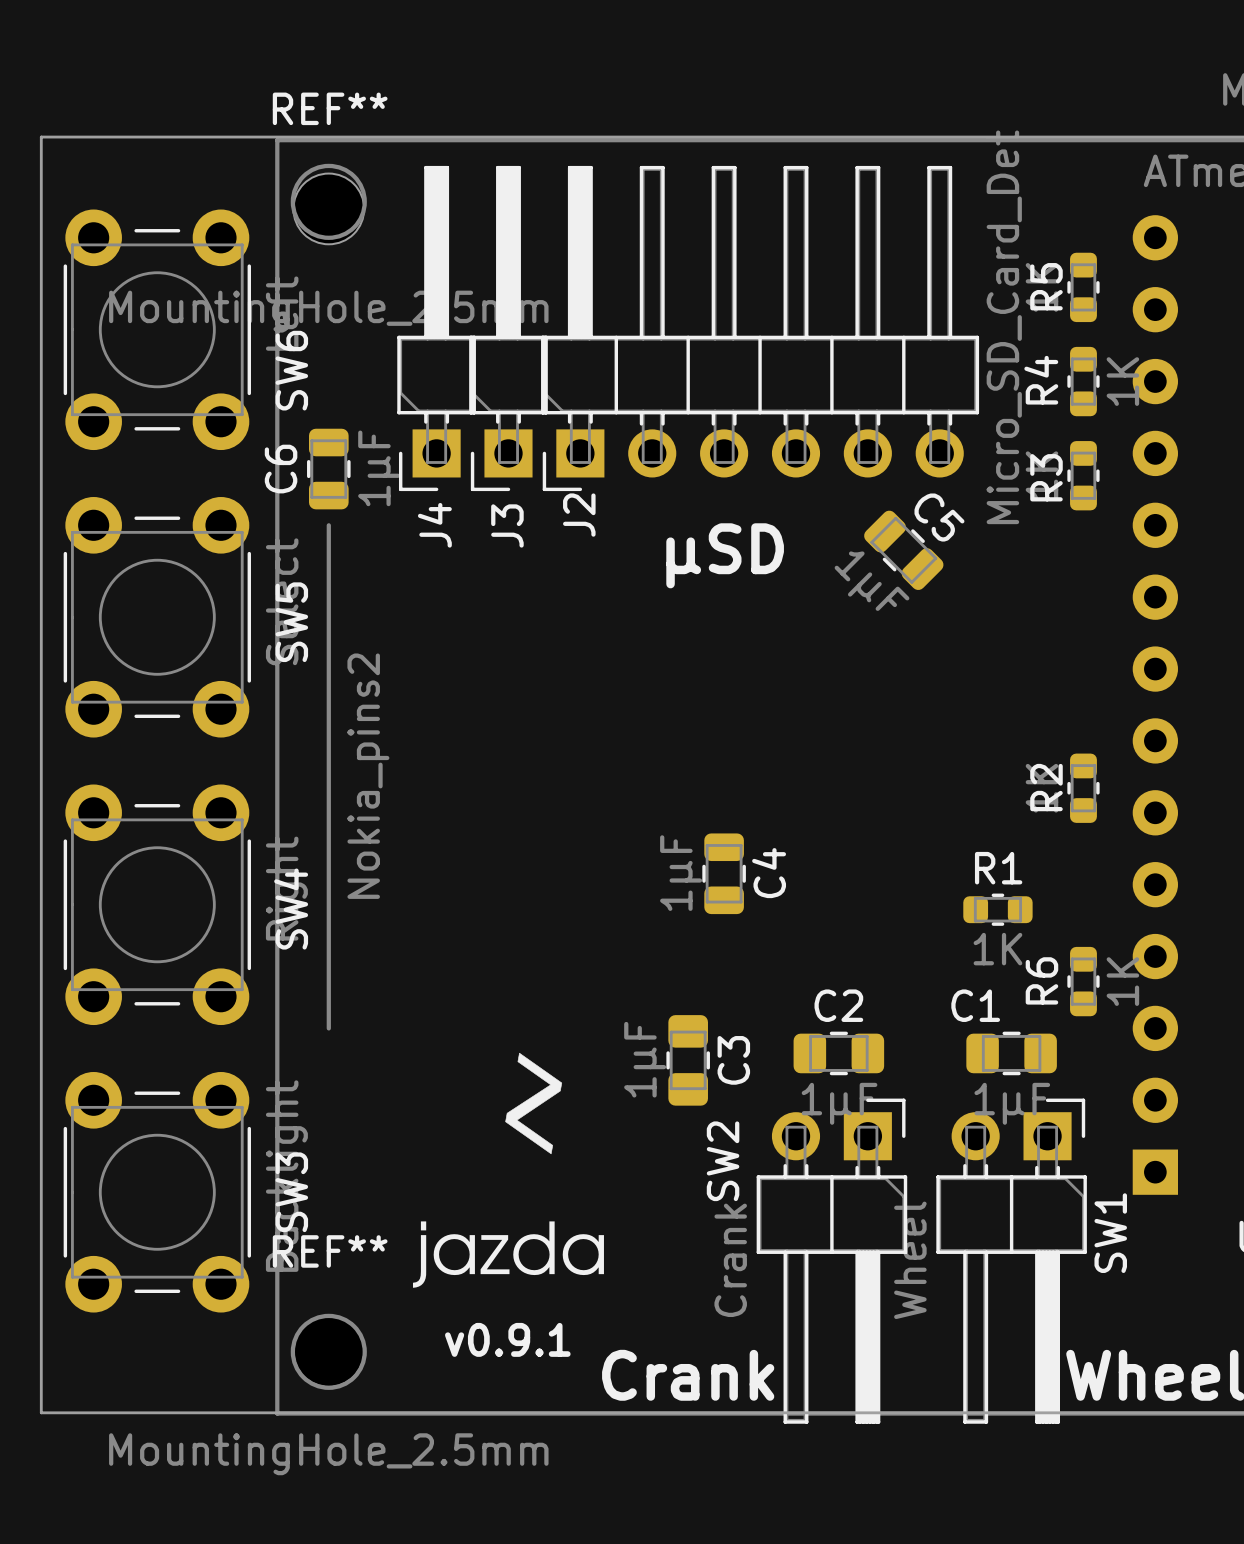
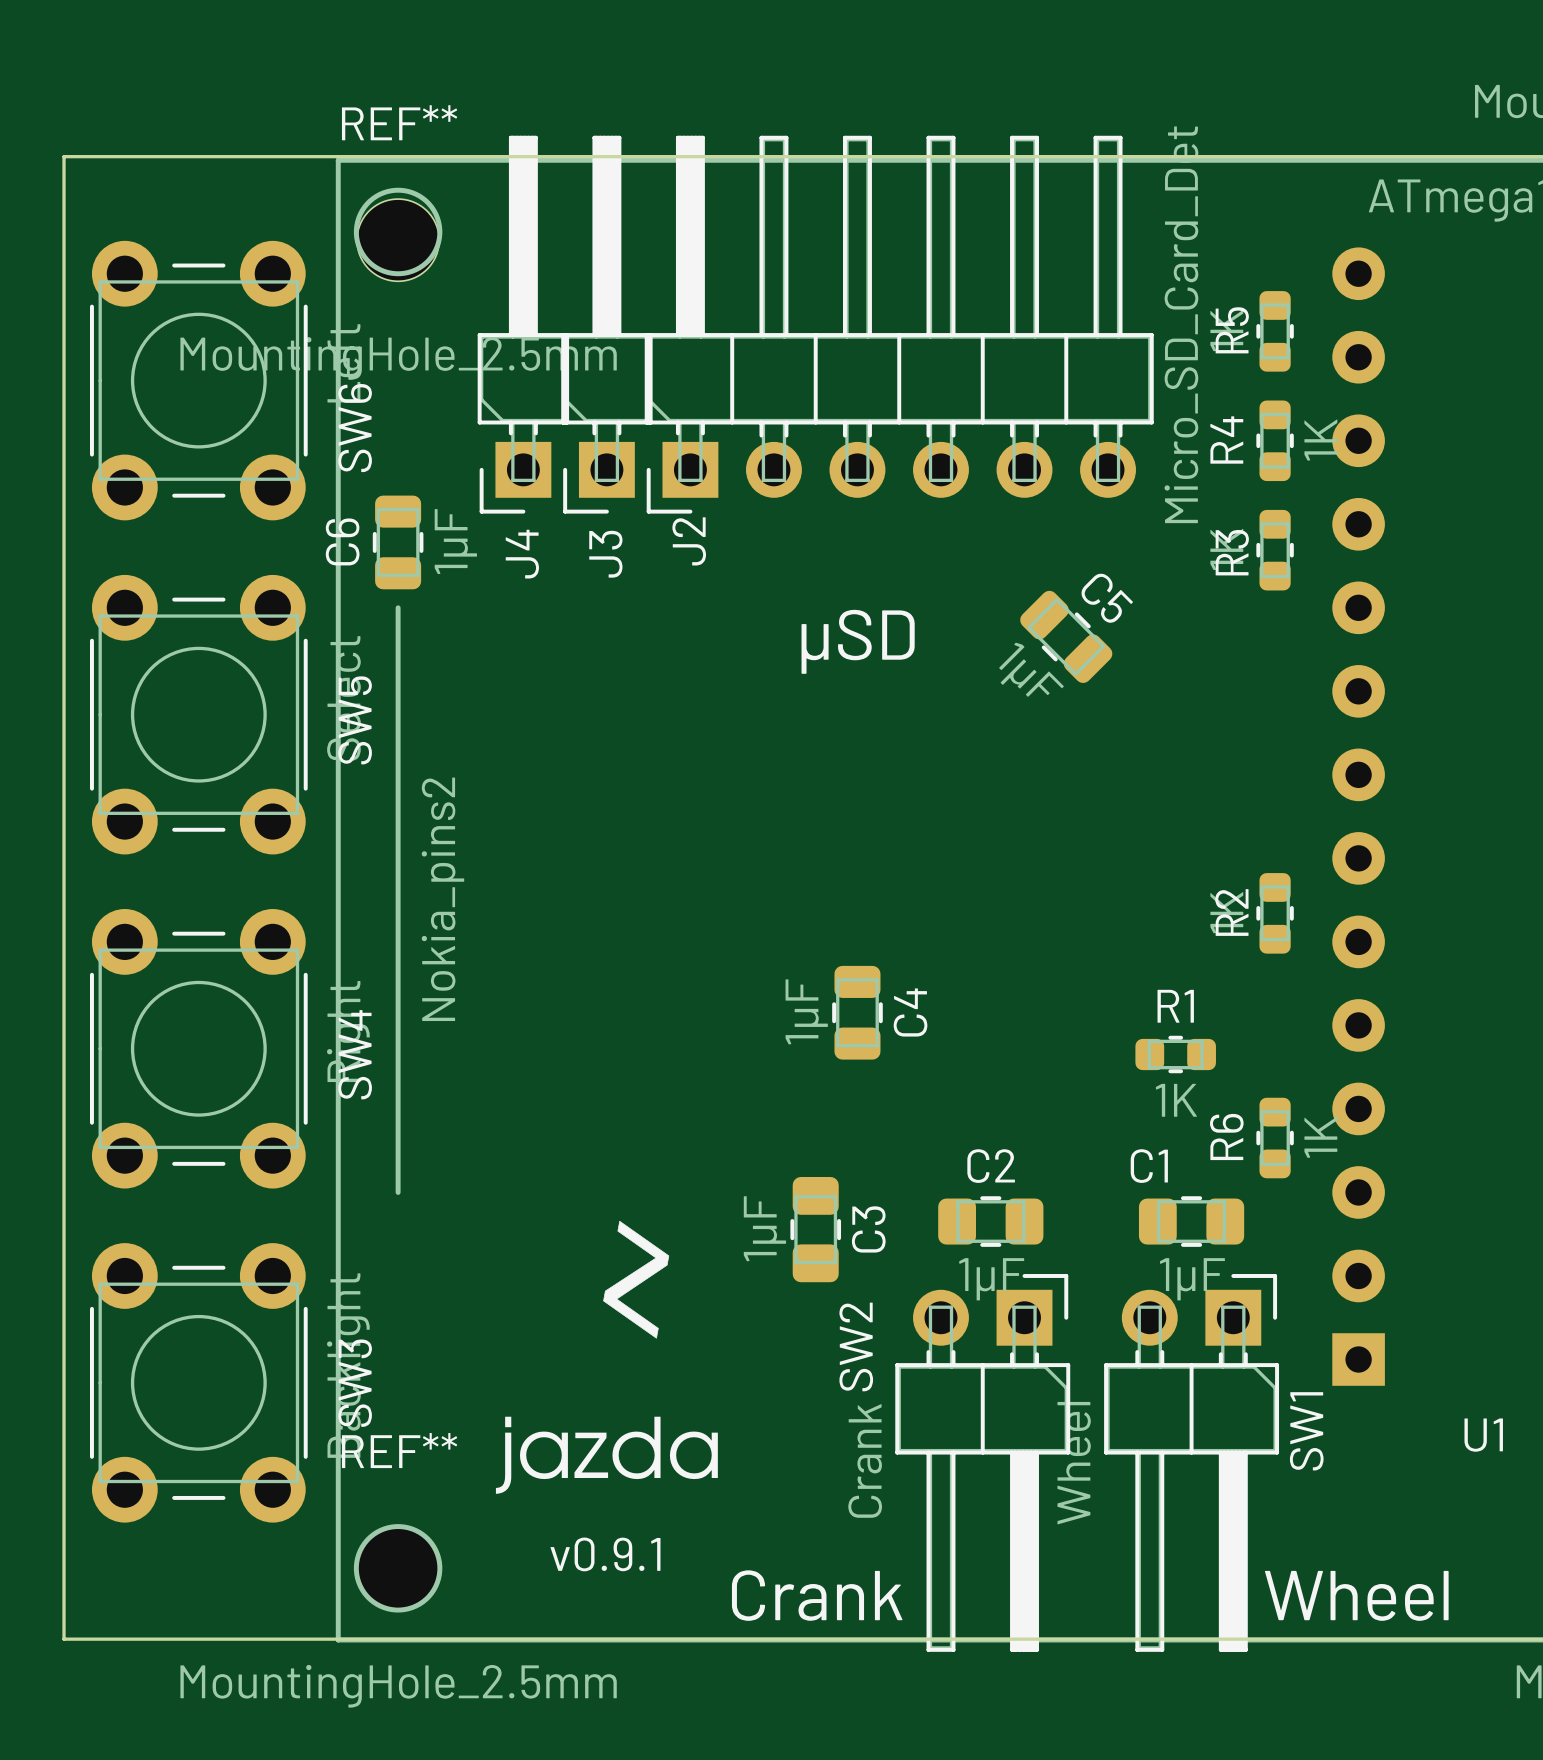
J4 position: (436, 328) -> (523, 324)
J3 position: (508, 328) -> (606, 324)
J2 position: (760, 328) -> (899, 324)

